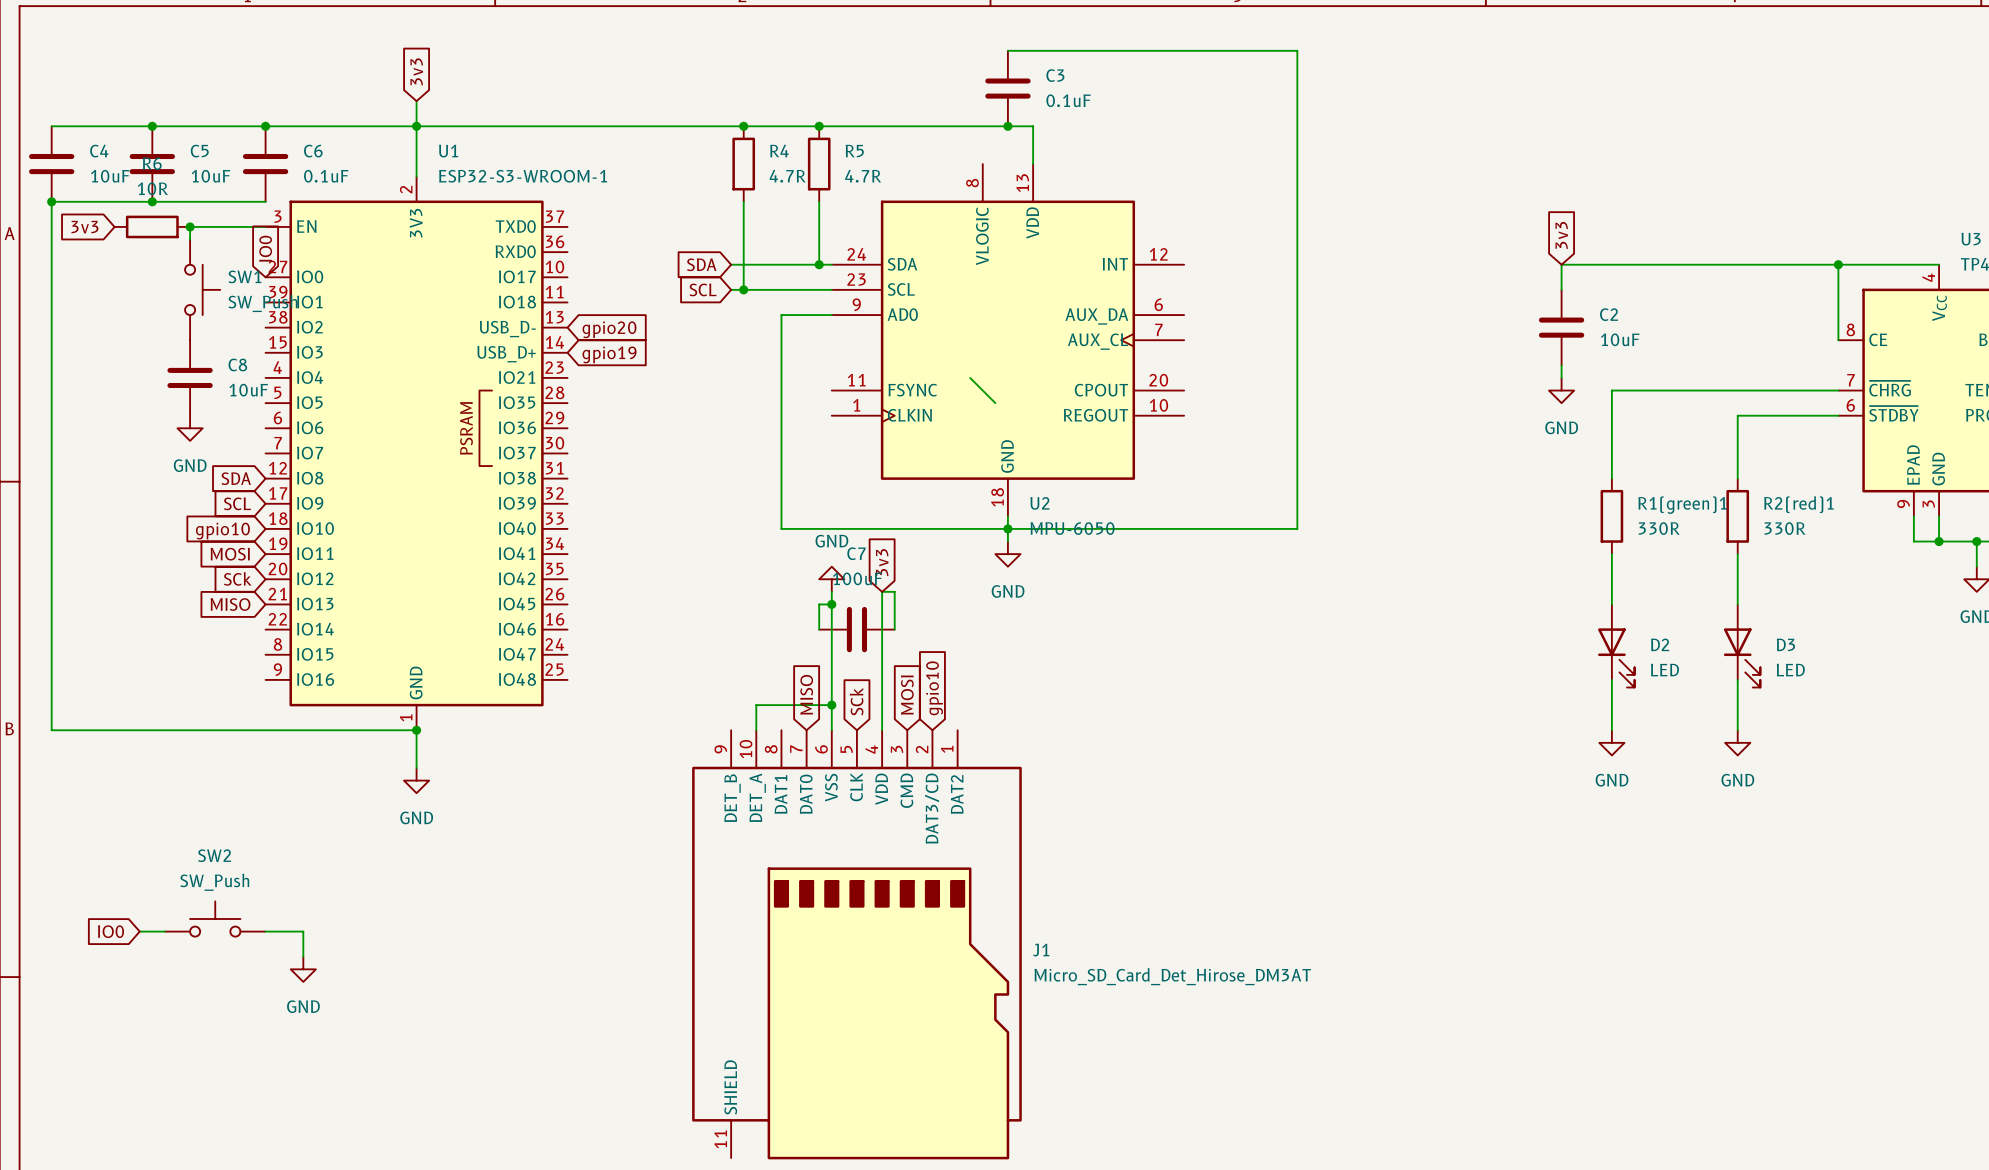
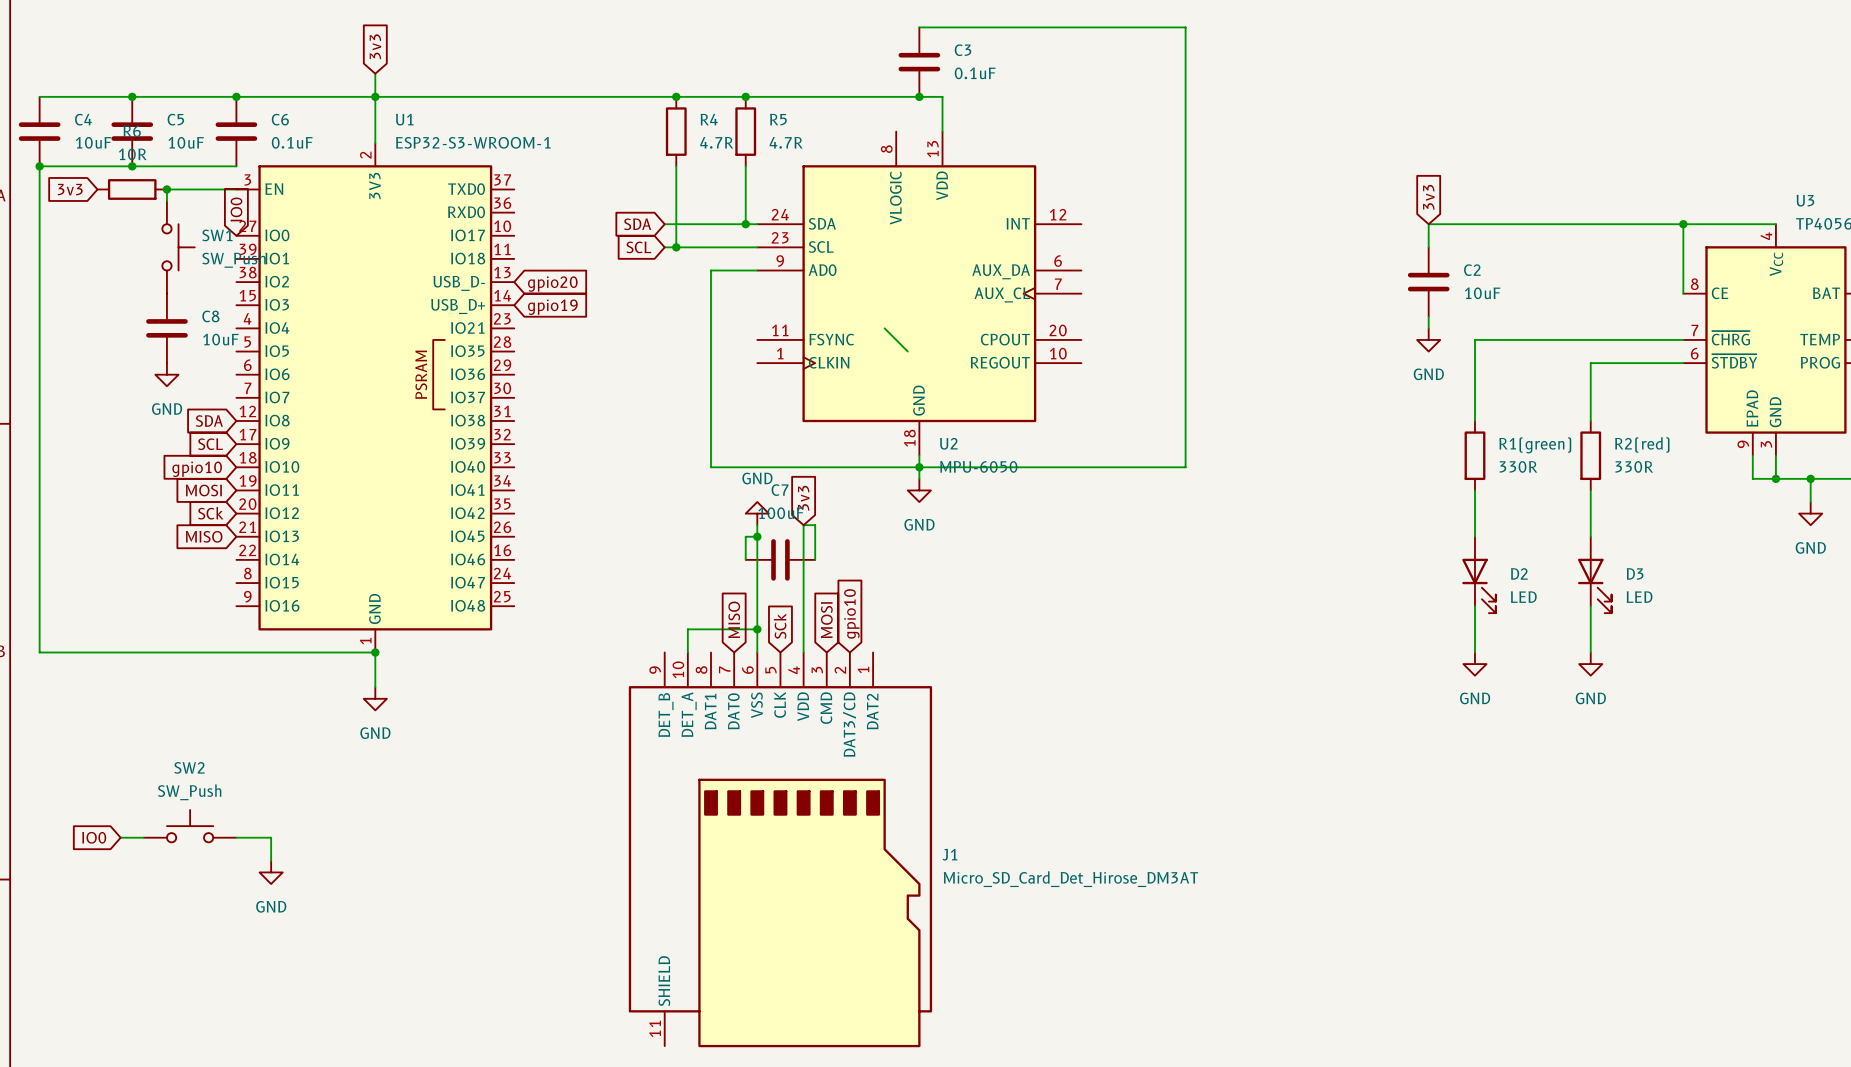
R2(red)1 name: R2(red)1 (1798, 504) -> R2(red) (1642, 444)
R1(green)1 name: R1(green)1 (1682, 505) -> R1(green) (1535, 445)

